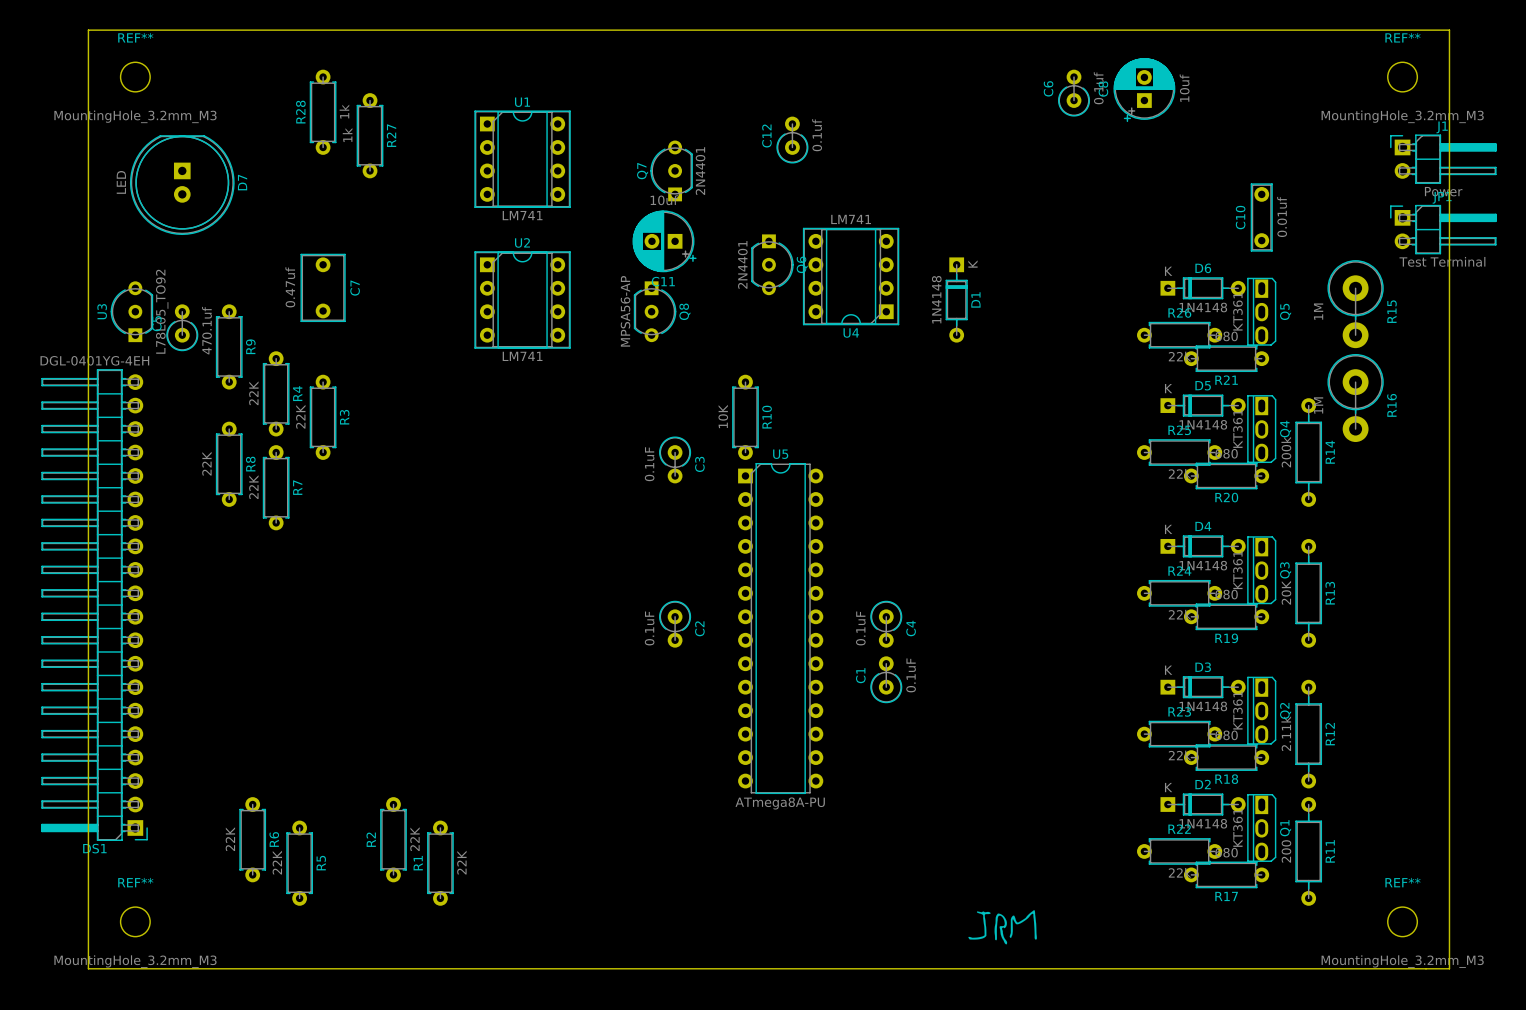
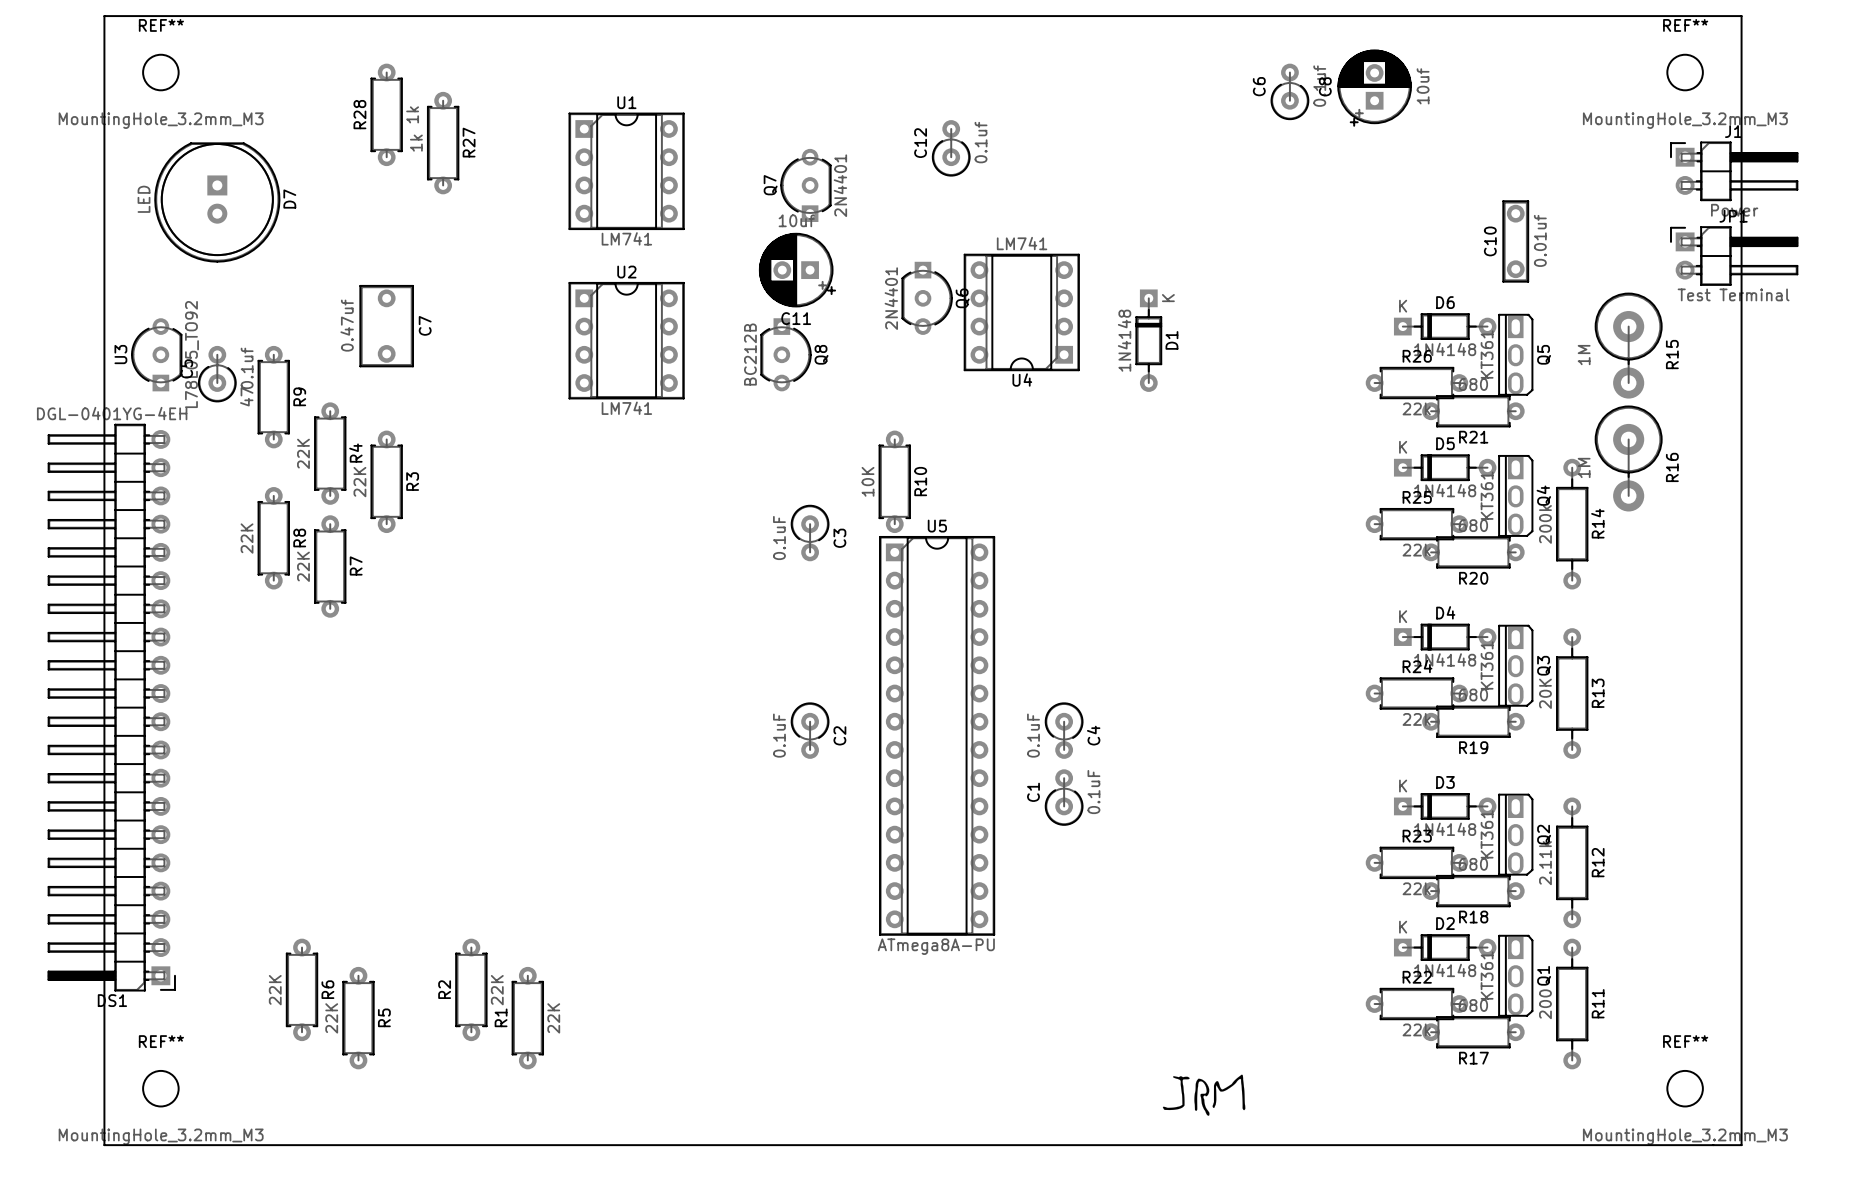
Q8 value: MPSA56-AP (625, 311) -> BC212B (750, 354)
U5 footprint: [738, 463, 824, 794] -> [879, 536, 995, 936]

